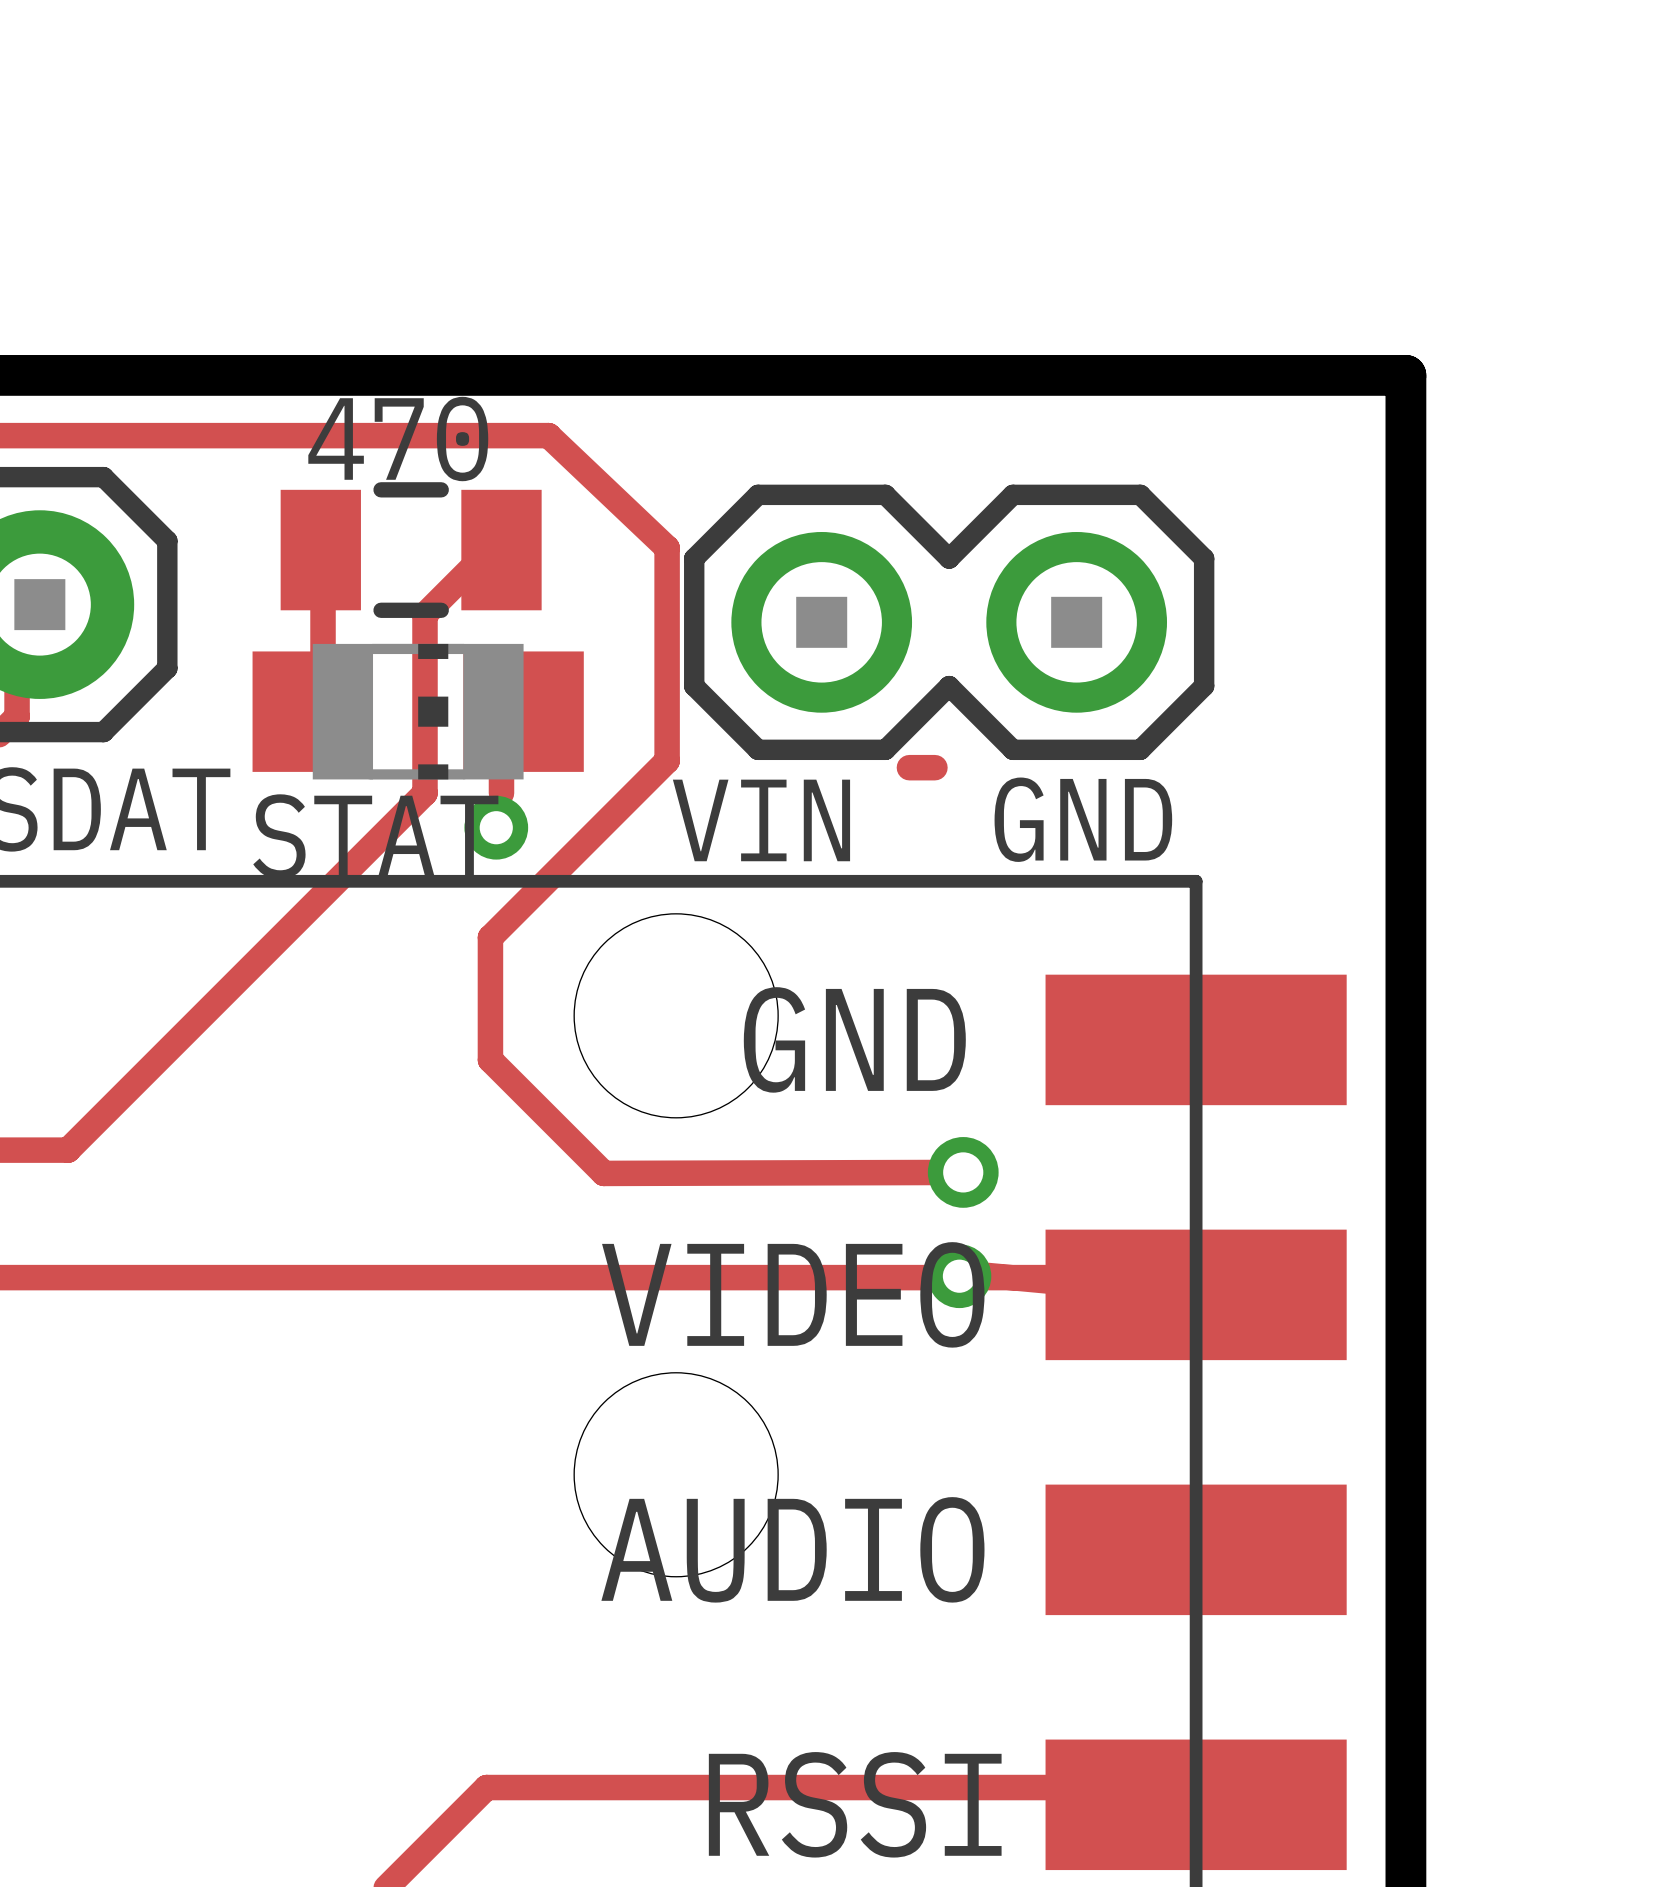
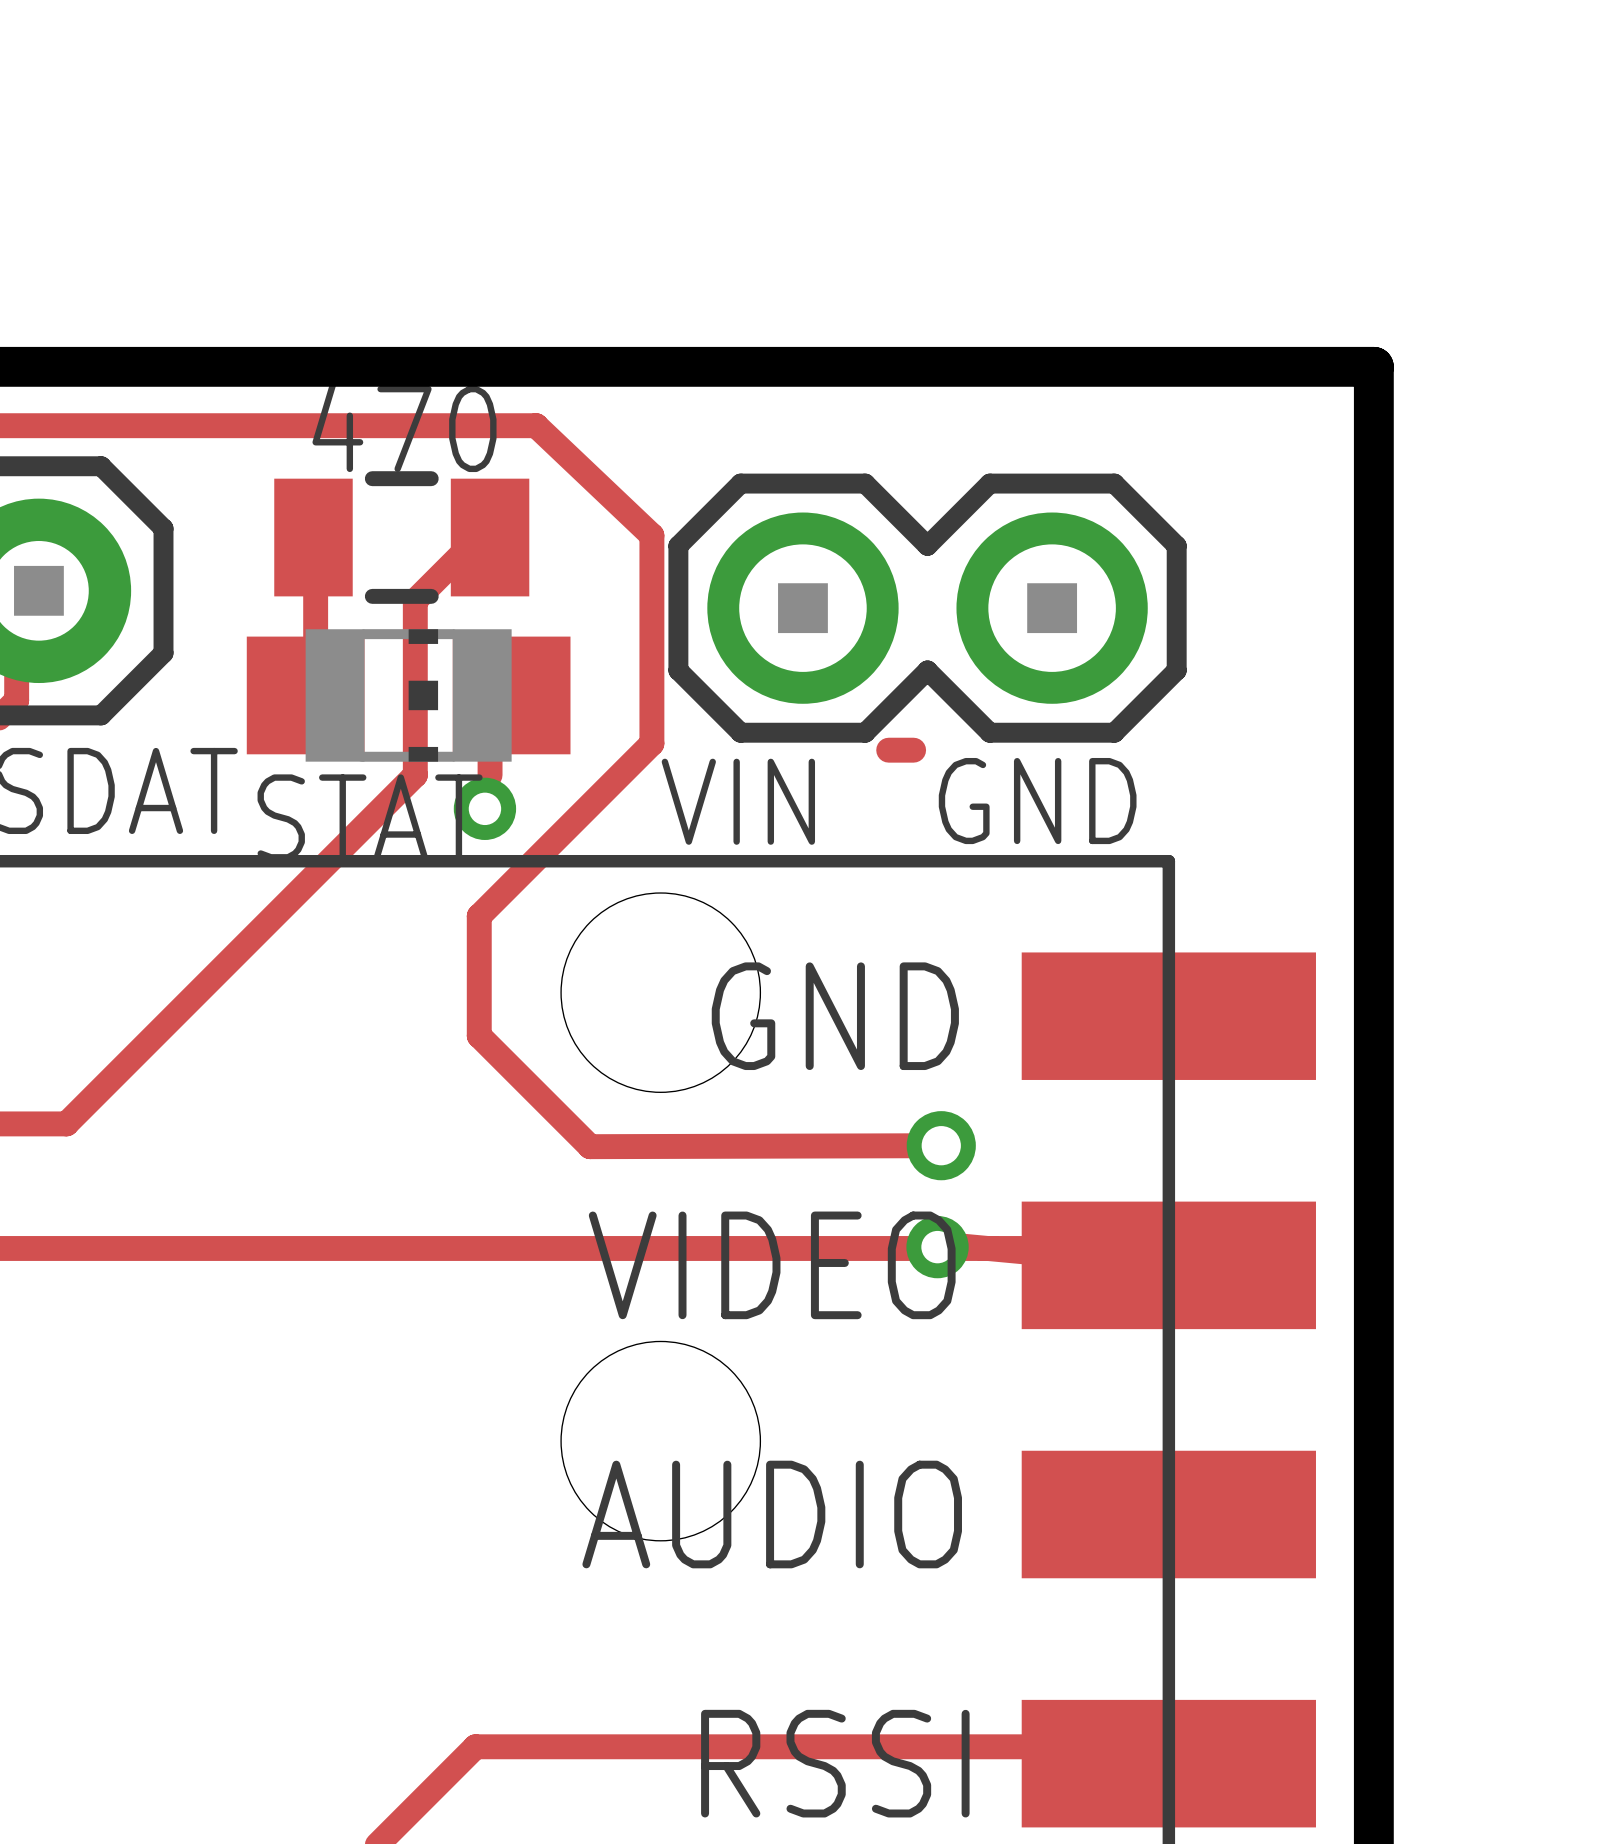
part footprint: [684, 484, 1215, 761] -> [668, 473, 1187, 743]

